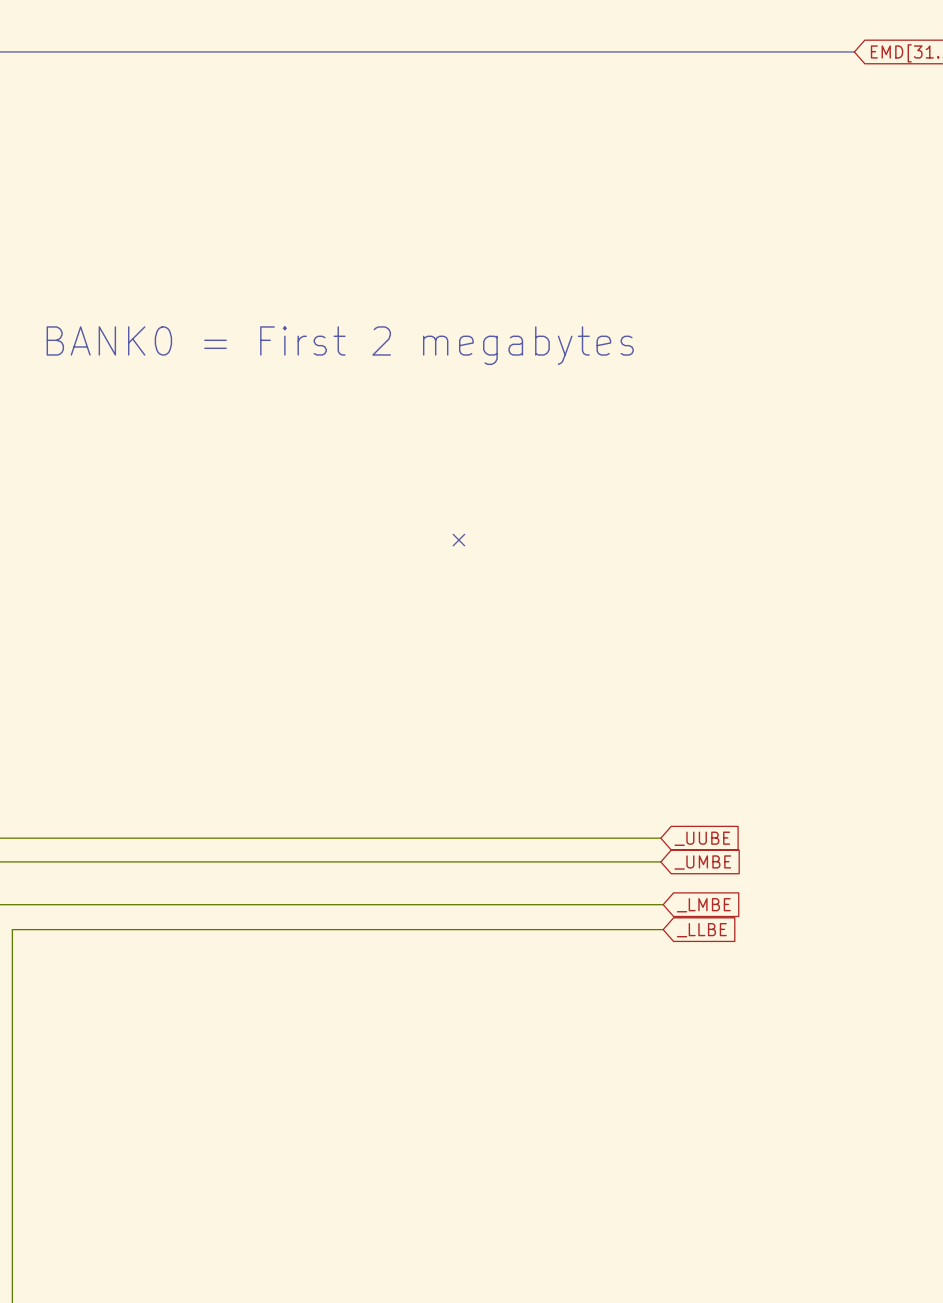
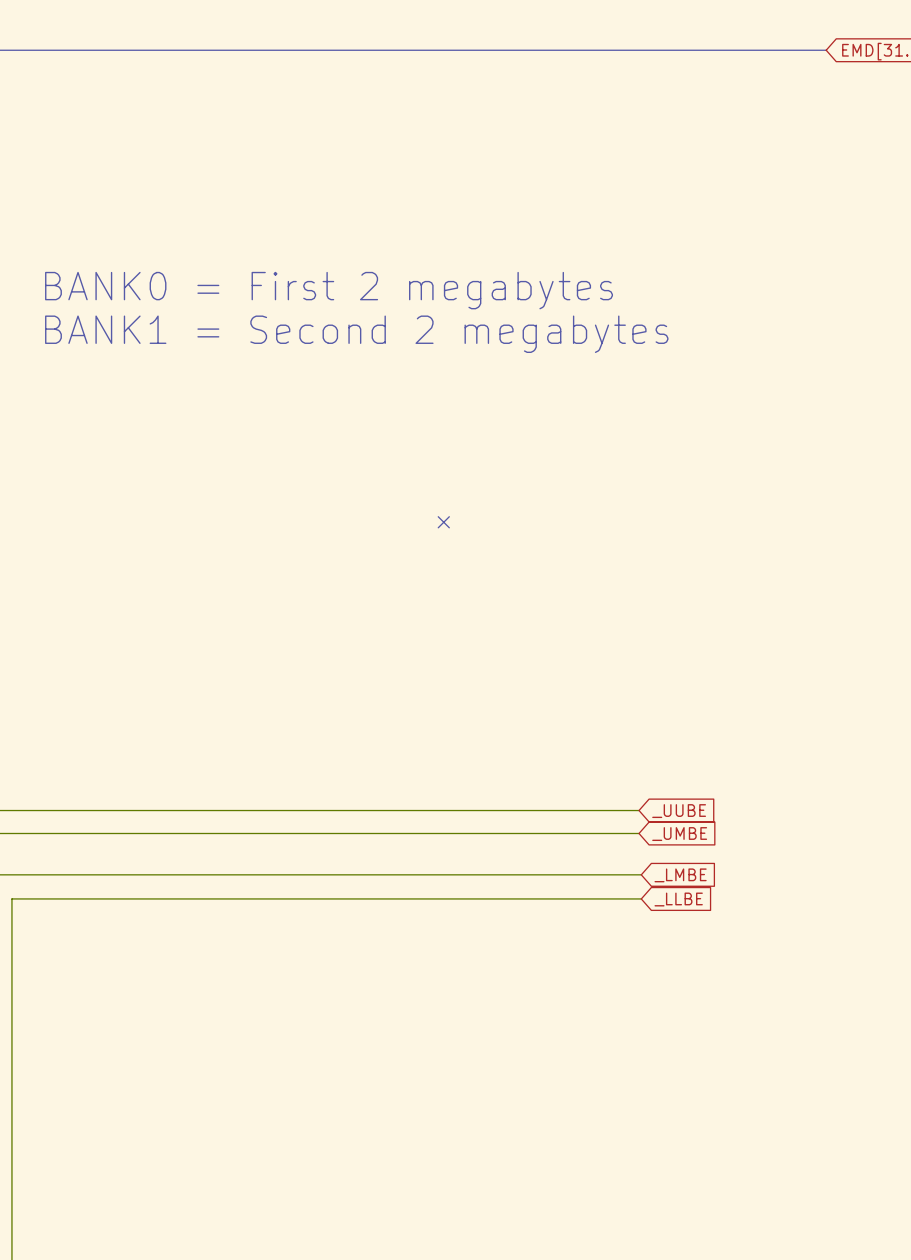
text: none -> BANK0 = First 2 megabytes (329, 290)
text: BANK0 = First 2 megabytes (340, 345) -> BANK1 = Second 2 megabytes (356, 334)

